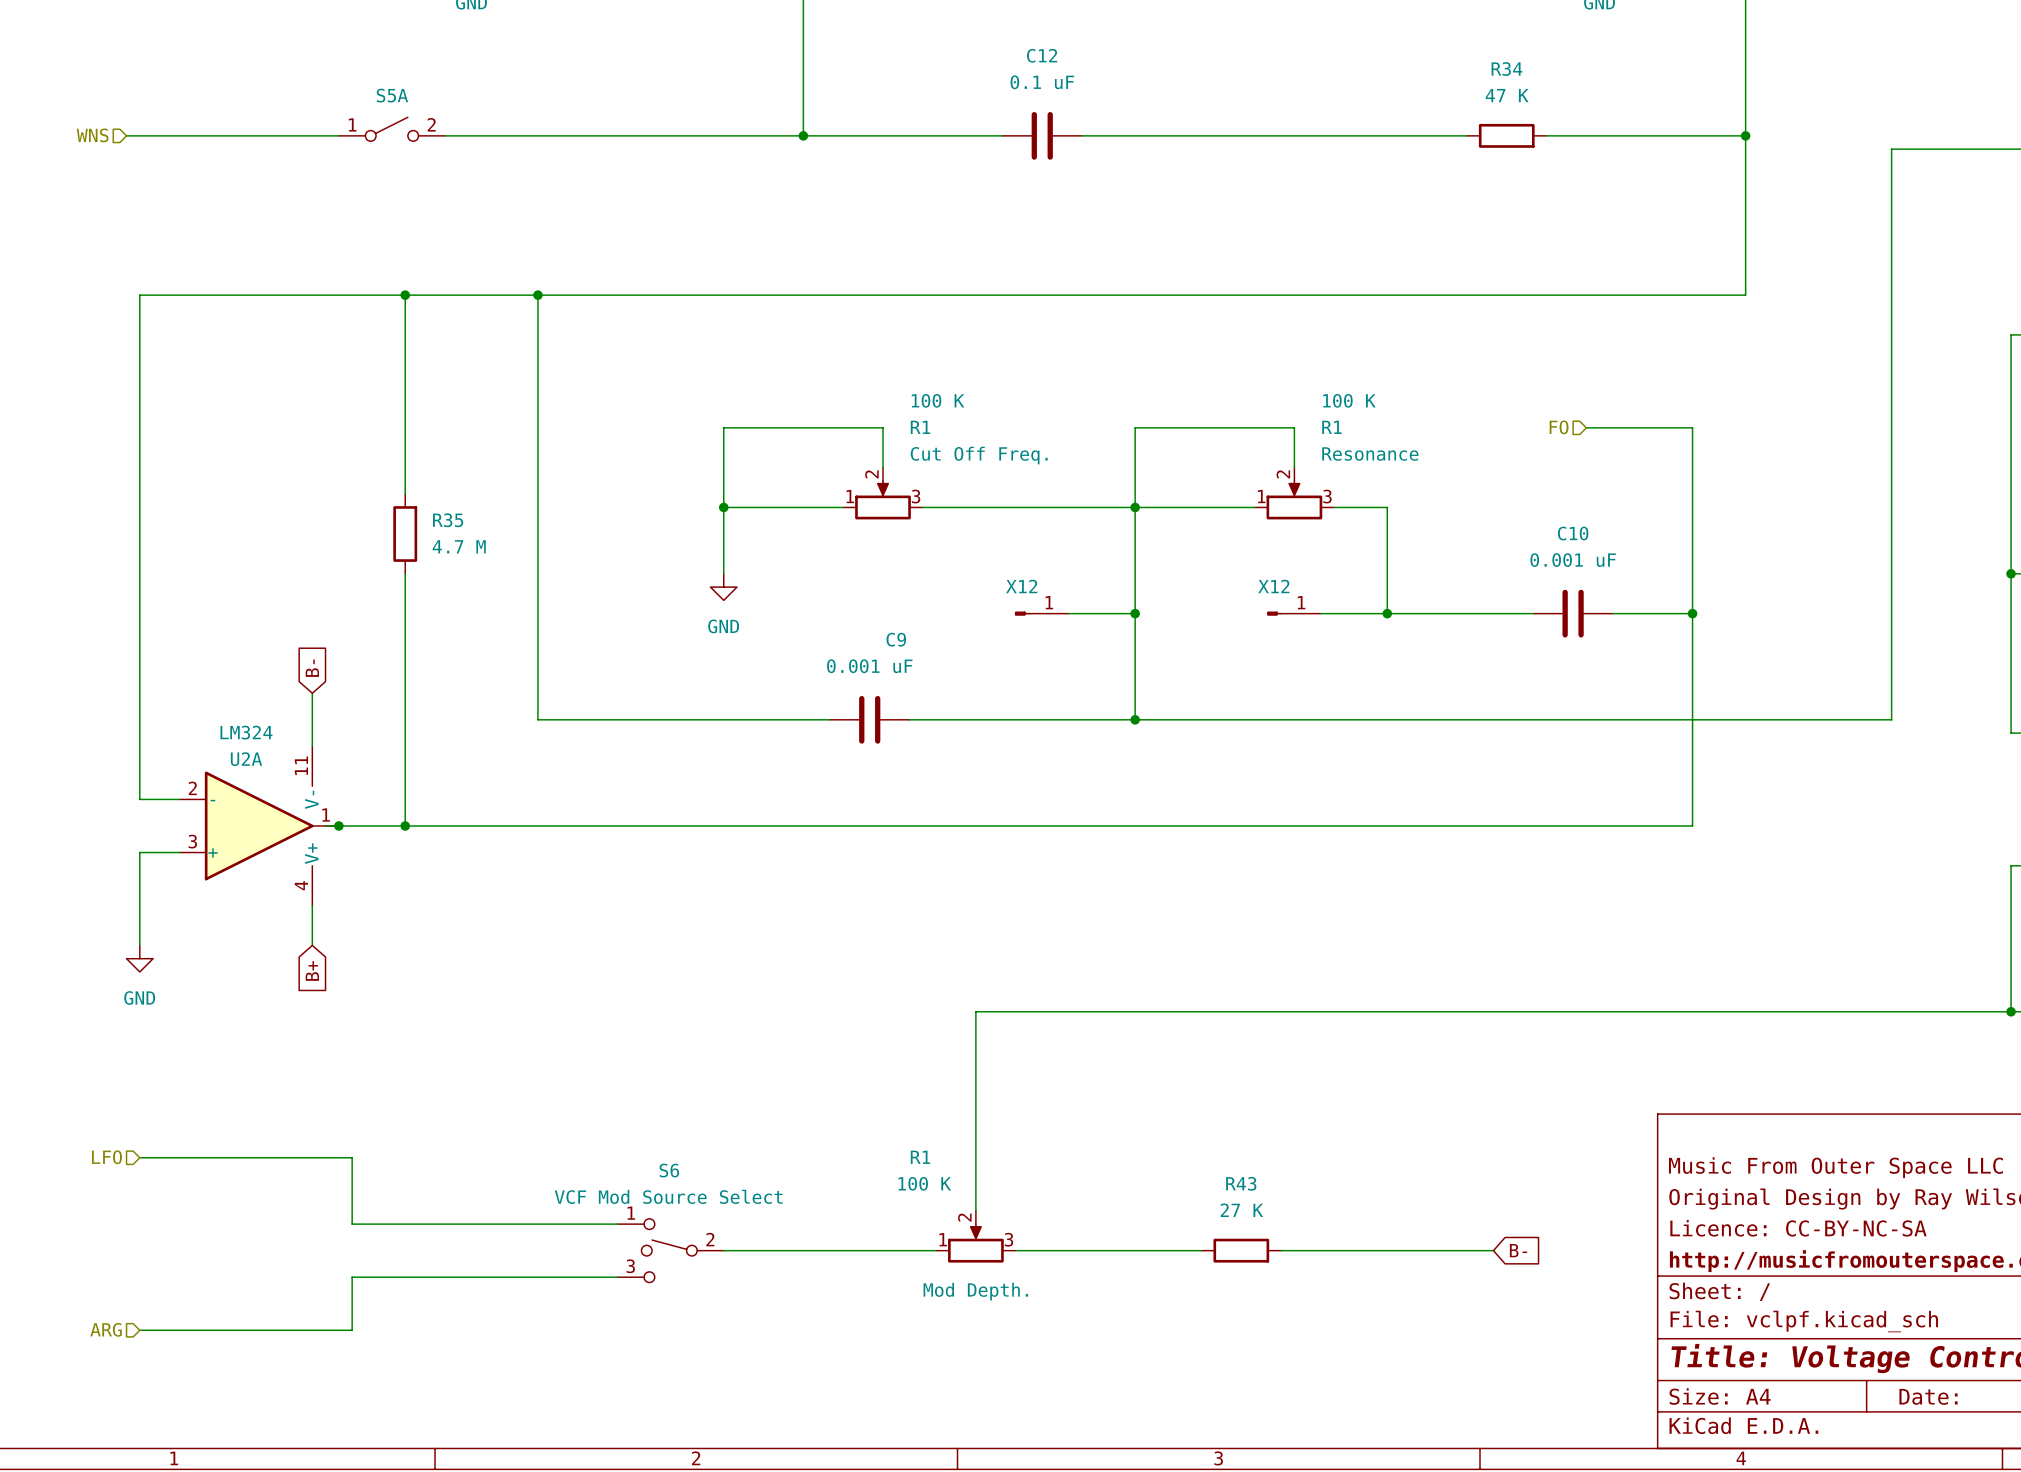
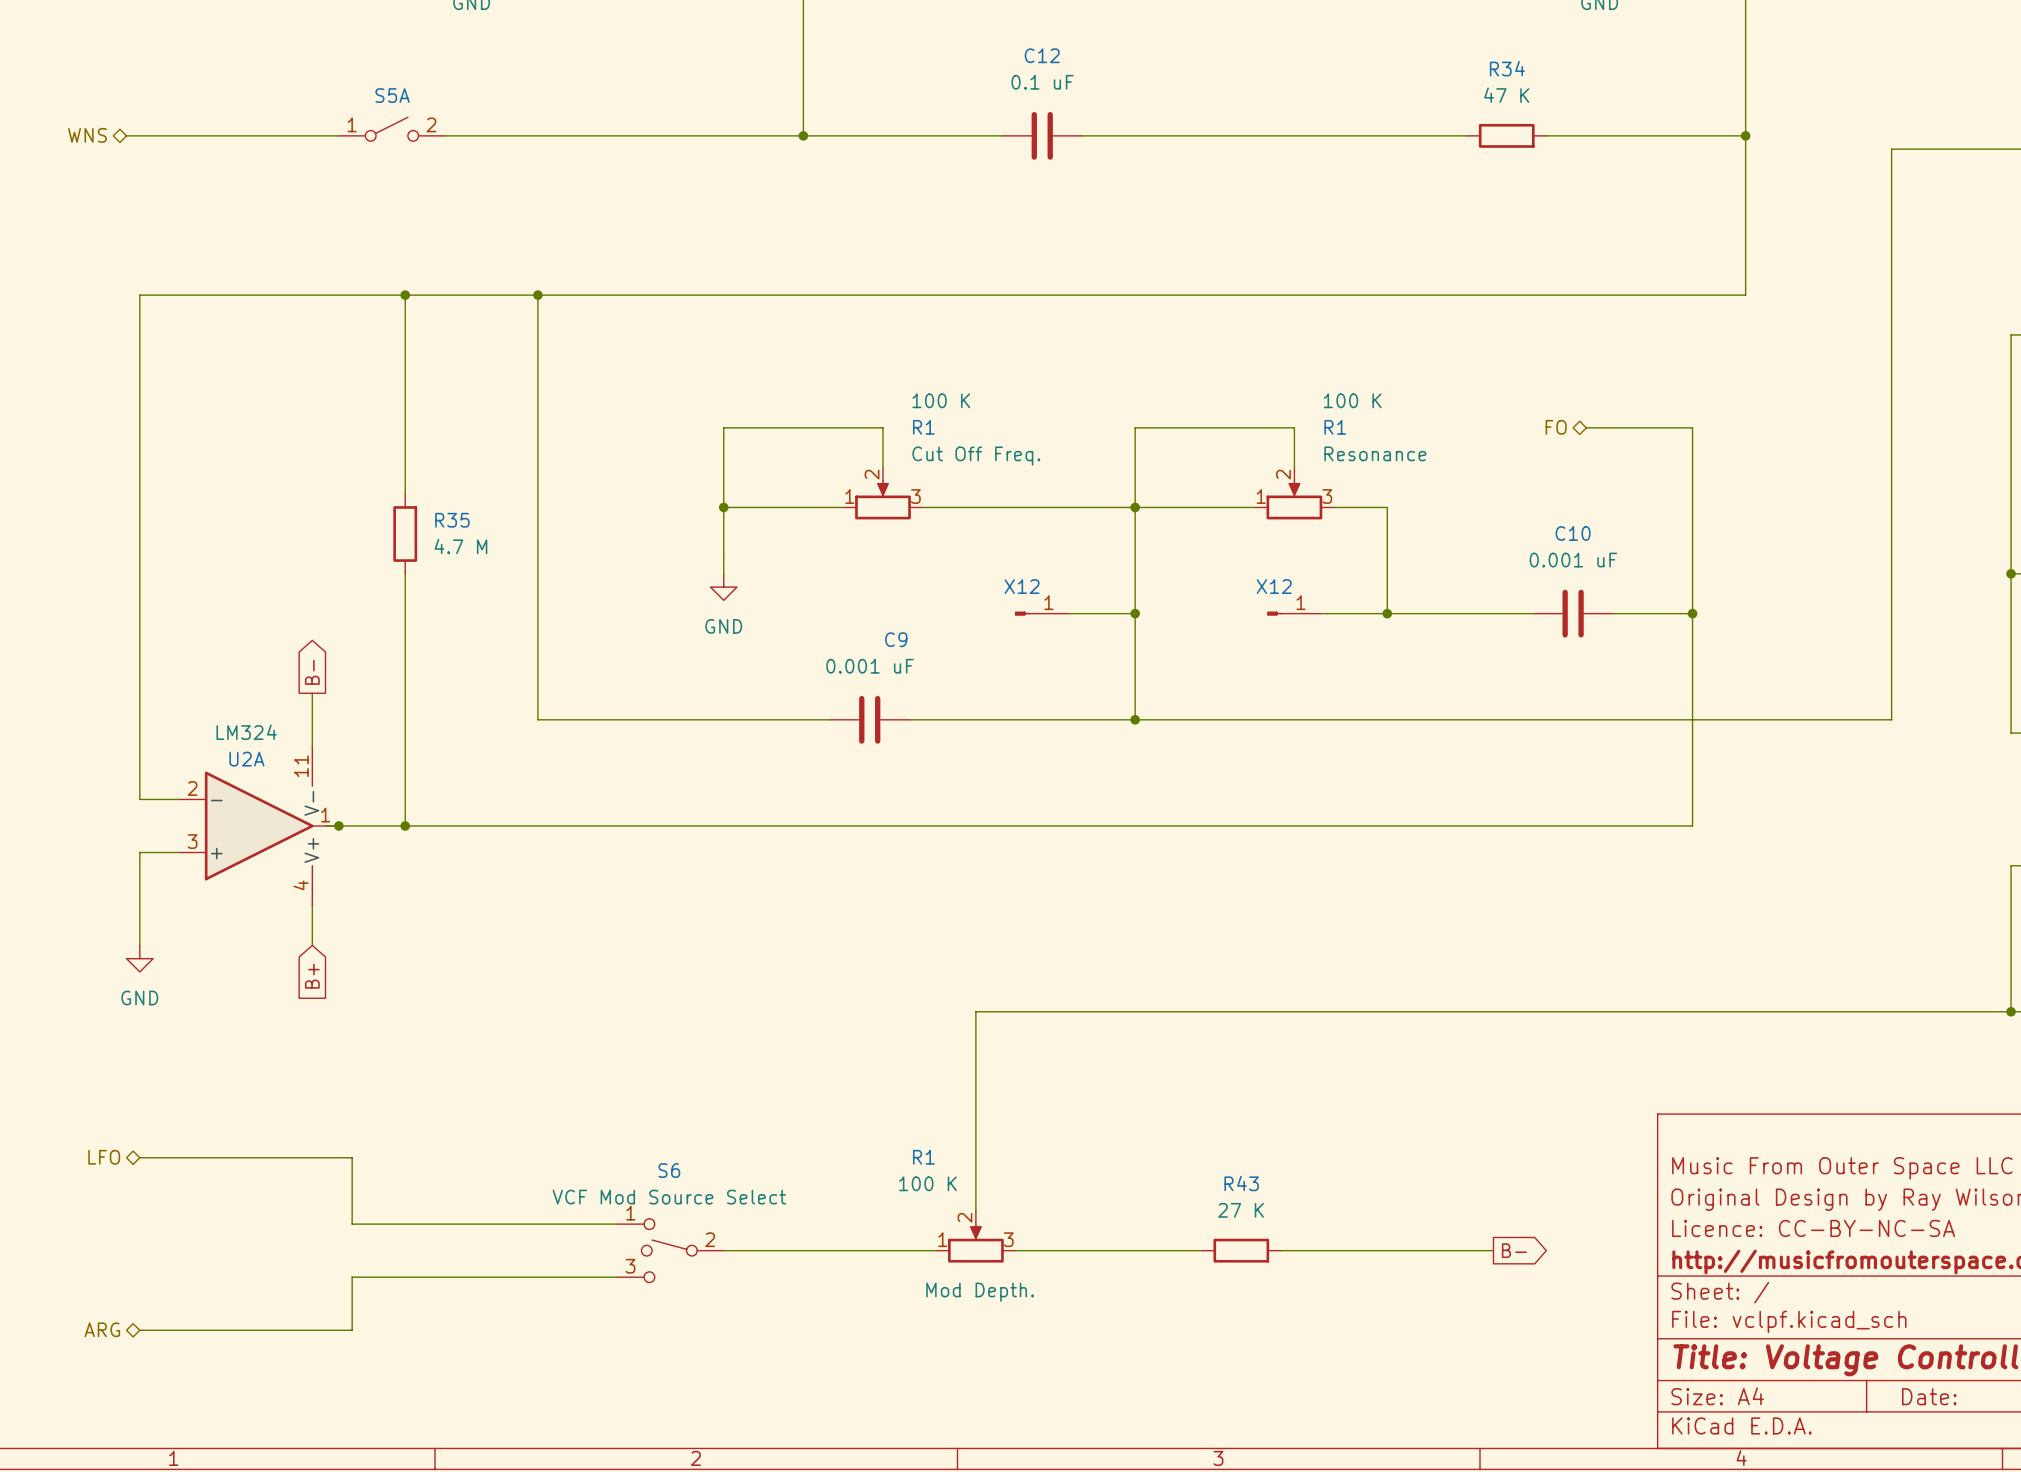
hierarchical label shape: input (92, 135) -> bidirectional (87, 135)
hierarchical label shape: input (1559, 427) -> bidirectional (1556, 427)
global label shape: input (312, 668) -> output (312, 672)
hierarchical label shape: input (106, 1157) -> bidirectional (104, 1157)
global label shape: input (1518, 1250) -> output (1514, 1250)
hierarchical label shape: input (106, 1329) -> bidirectional (102, 1329)

